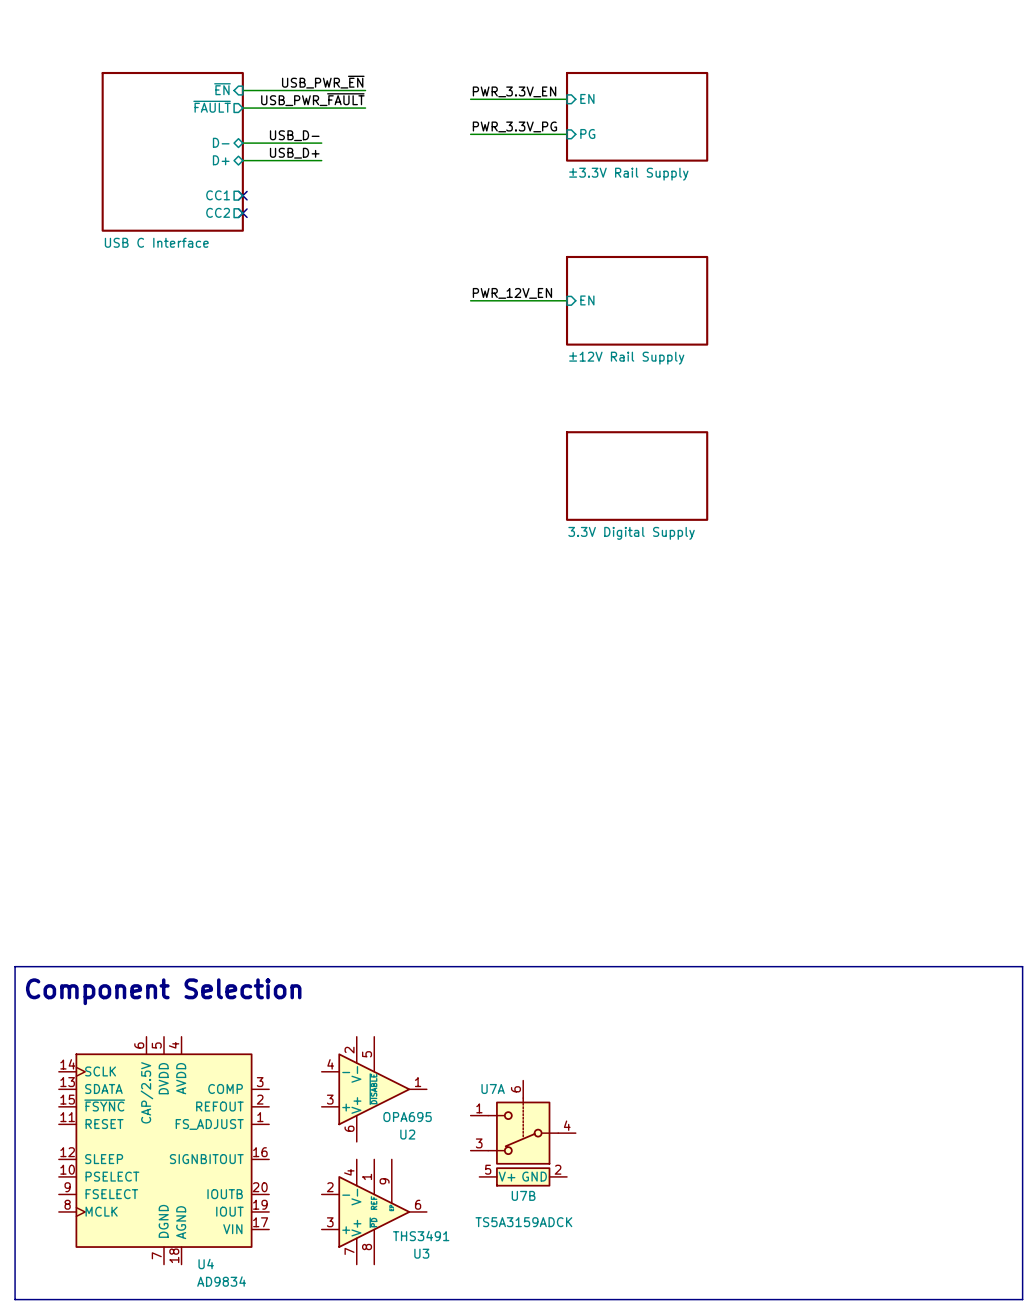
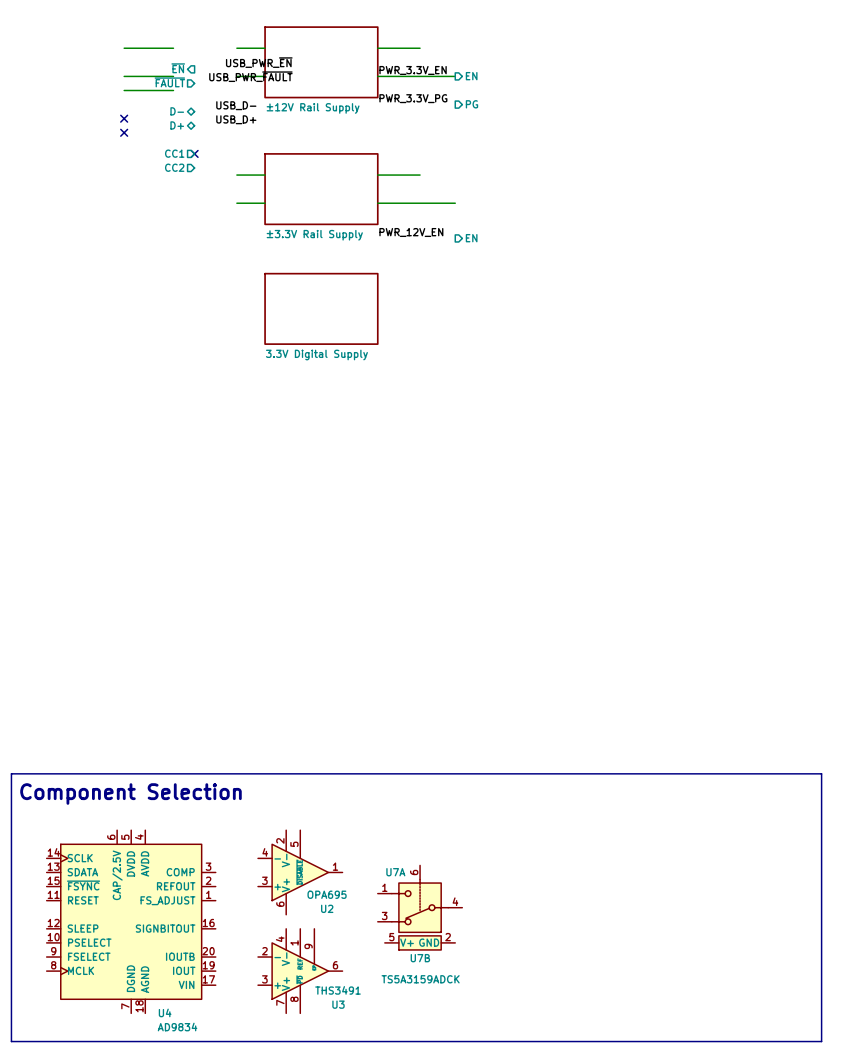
wire: none -> (124, 48) (173, 48)
wire: none -> (236, 48) (265, 48)
wire: none -> (377, 48) (420, 48)
wire: (242, 90) (365, 90) -> none
wire: none -> (124, 76) (173, 76)
wire: none -> (236, 76) (265, 76)
wire: (242, 108) (365, 108) -> none
wire: none -> (124, 90) (173, 90)
sheet ±3.3V Rail Supply position: (637, 116) -> (321, 189)
wire: (470, 134) (567, 134) -> none
wire: (242, 143) (321, 143) -> none
no-connect mark: none -> (124, 118)
sheet USB C Interface: (172, 151) -> none
wire: (242, 160) (321, 160) -> none
no-connect mark: none -> (124, 132)
no-connect mark: (242, 213) -> none
wire: none -> (236, 175) (265, 175)
wire: none -> (377, 175) (420, 175)
wire: none -> (236, 203) (265, 203)
wire: (470, 300) (567, 300) -> (377, 203) (455, 203)
sheet ±12V Rail Supply position: (637, 300) -> (321, 62)
sheet 3.3V Digital Supply position: (637, 476) -> (321, 308)

